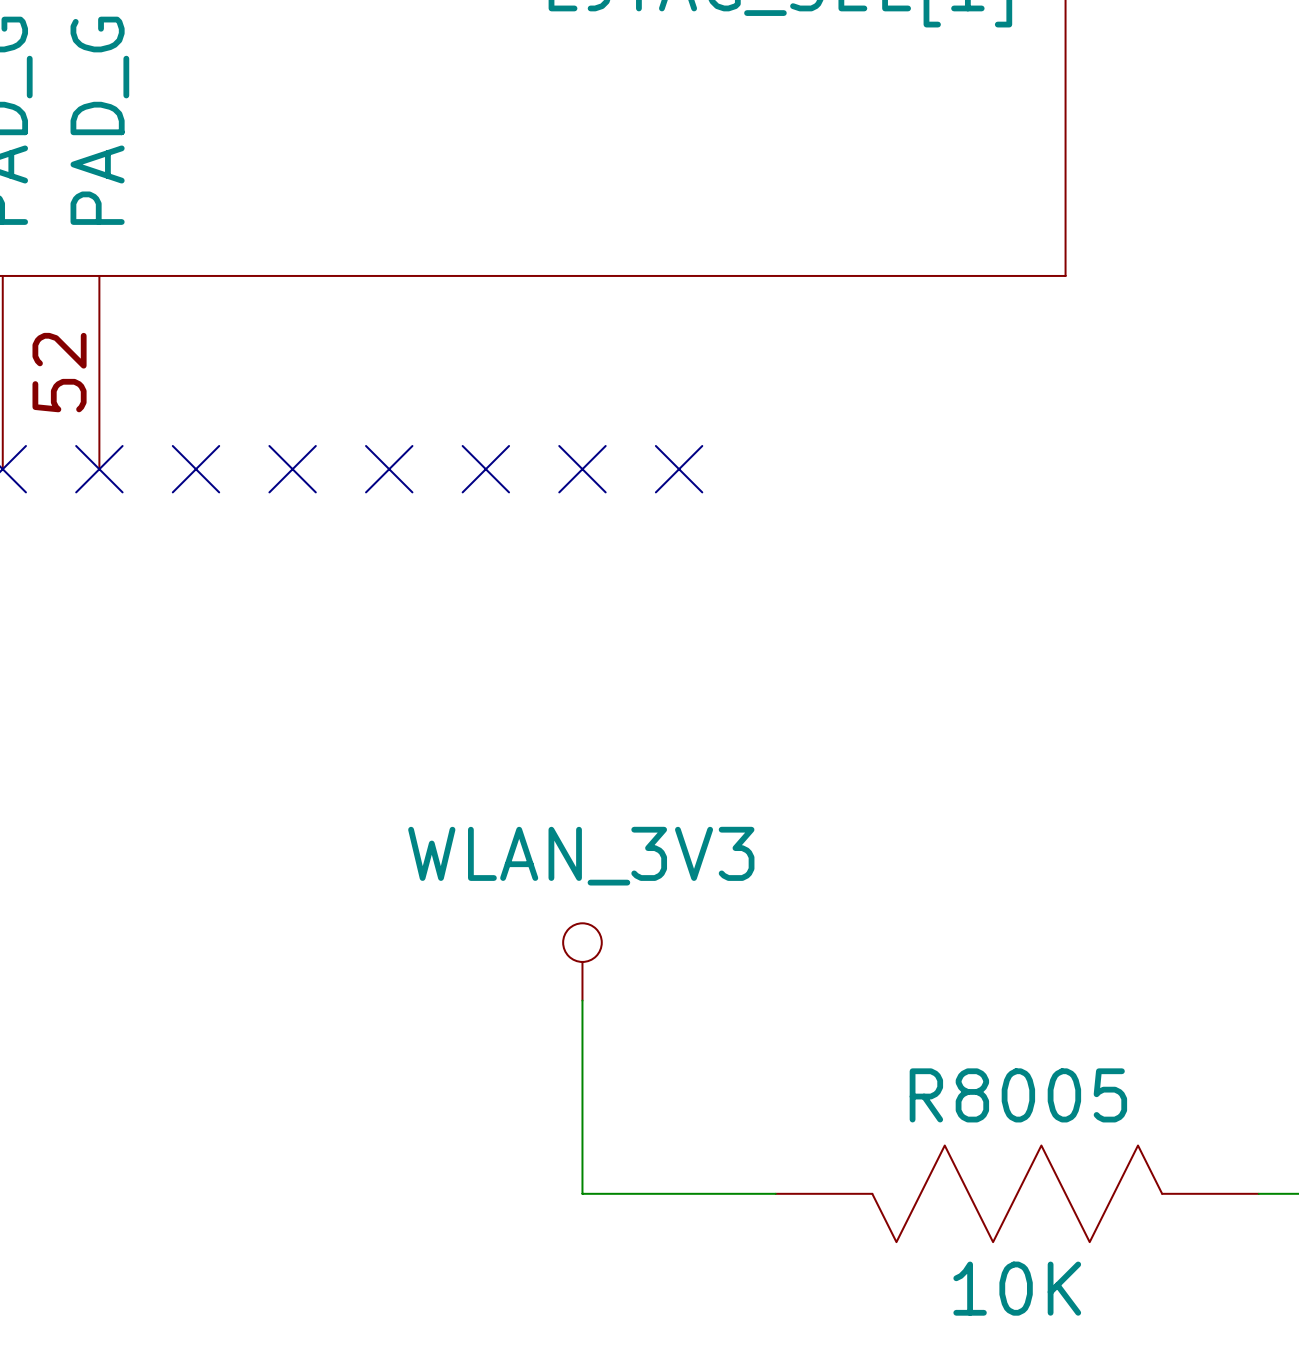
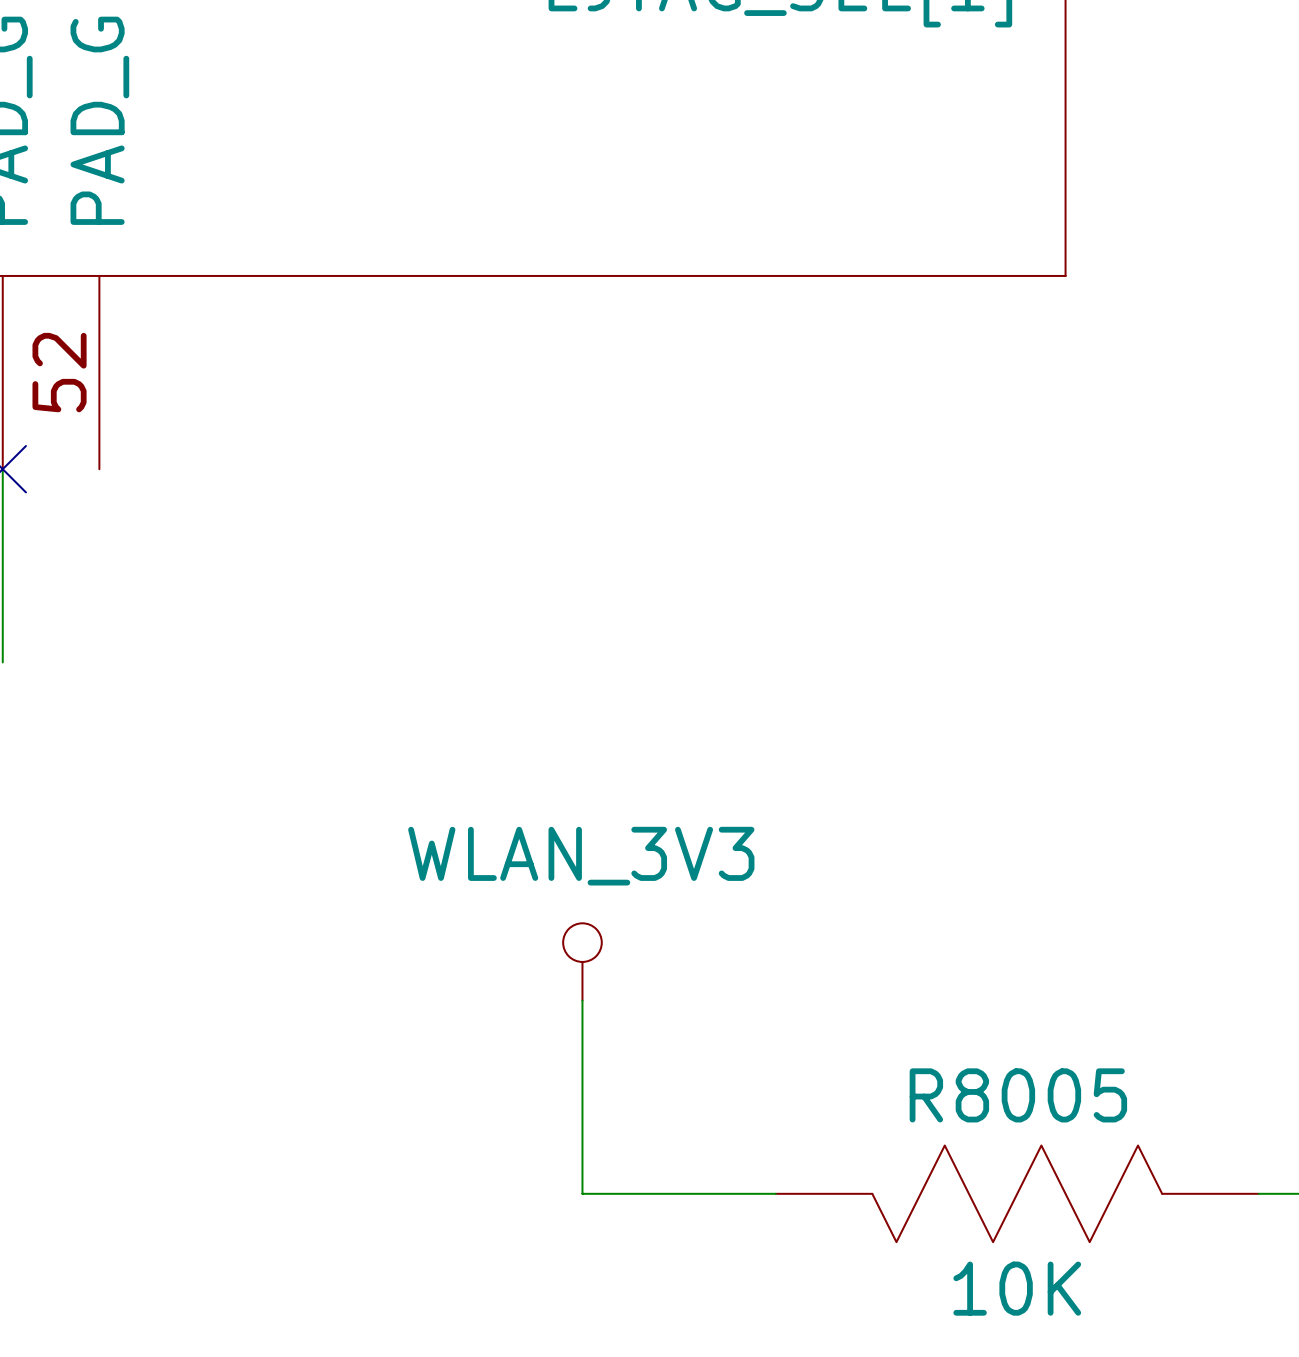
wire: none -> (2, 469) (2, 662)
no-connect mark: (99, 469) -> none
no-connect mark: (196, 469) -> none
no-connect mark: (292, 469) -> none
no-connect mark: (389, 469) -> none
no-connect mark: (485, 469) -> none
no-connect mark: (582, 469) -> none
no-connect mark: (679, 469) -> none

